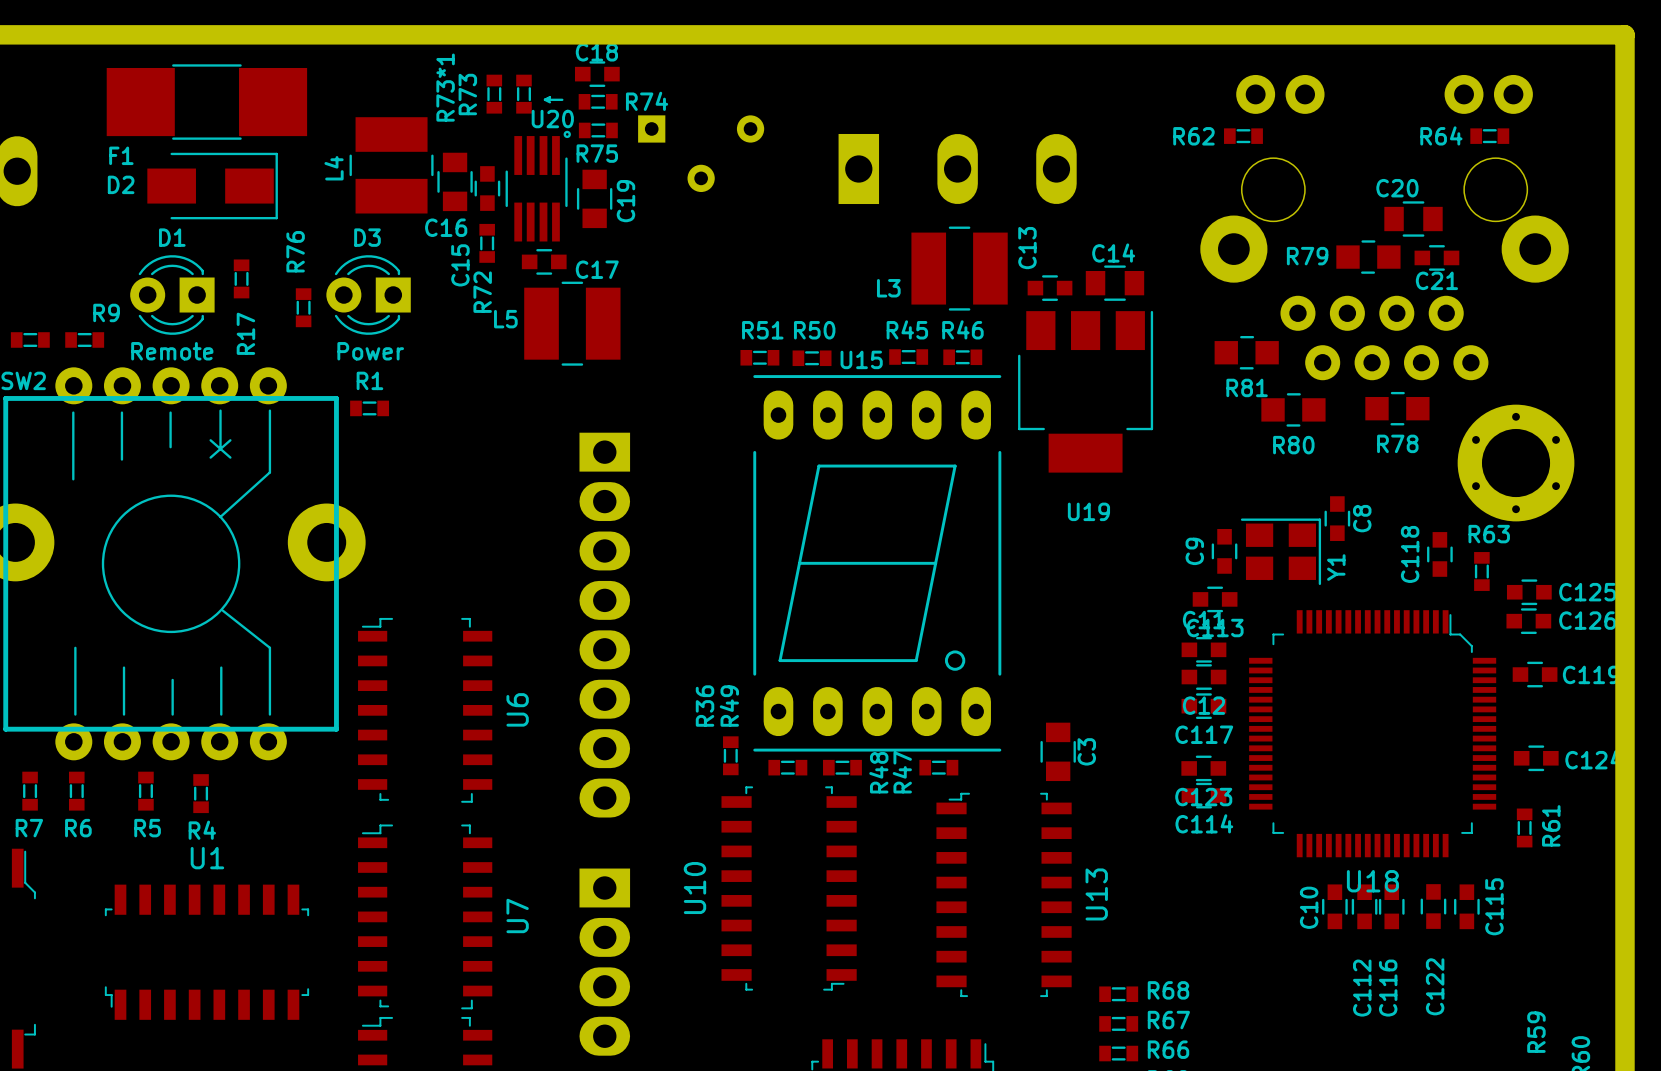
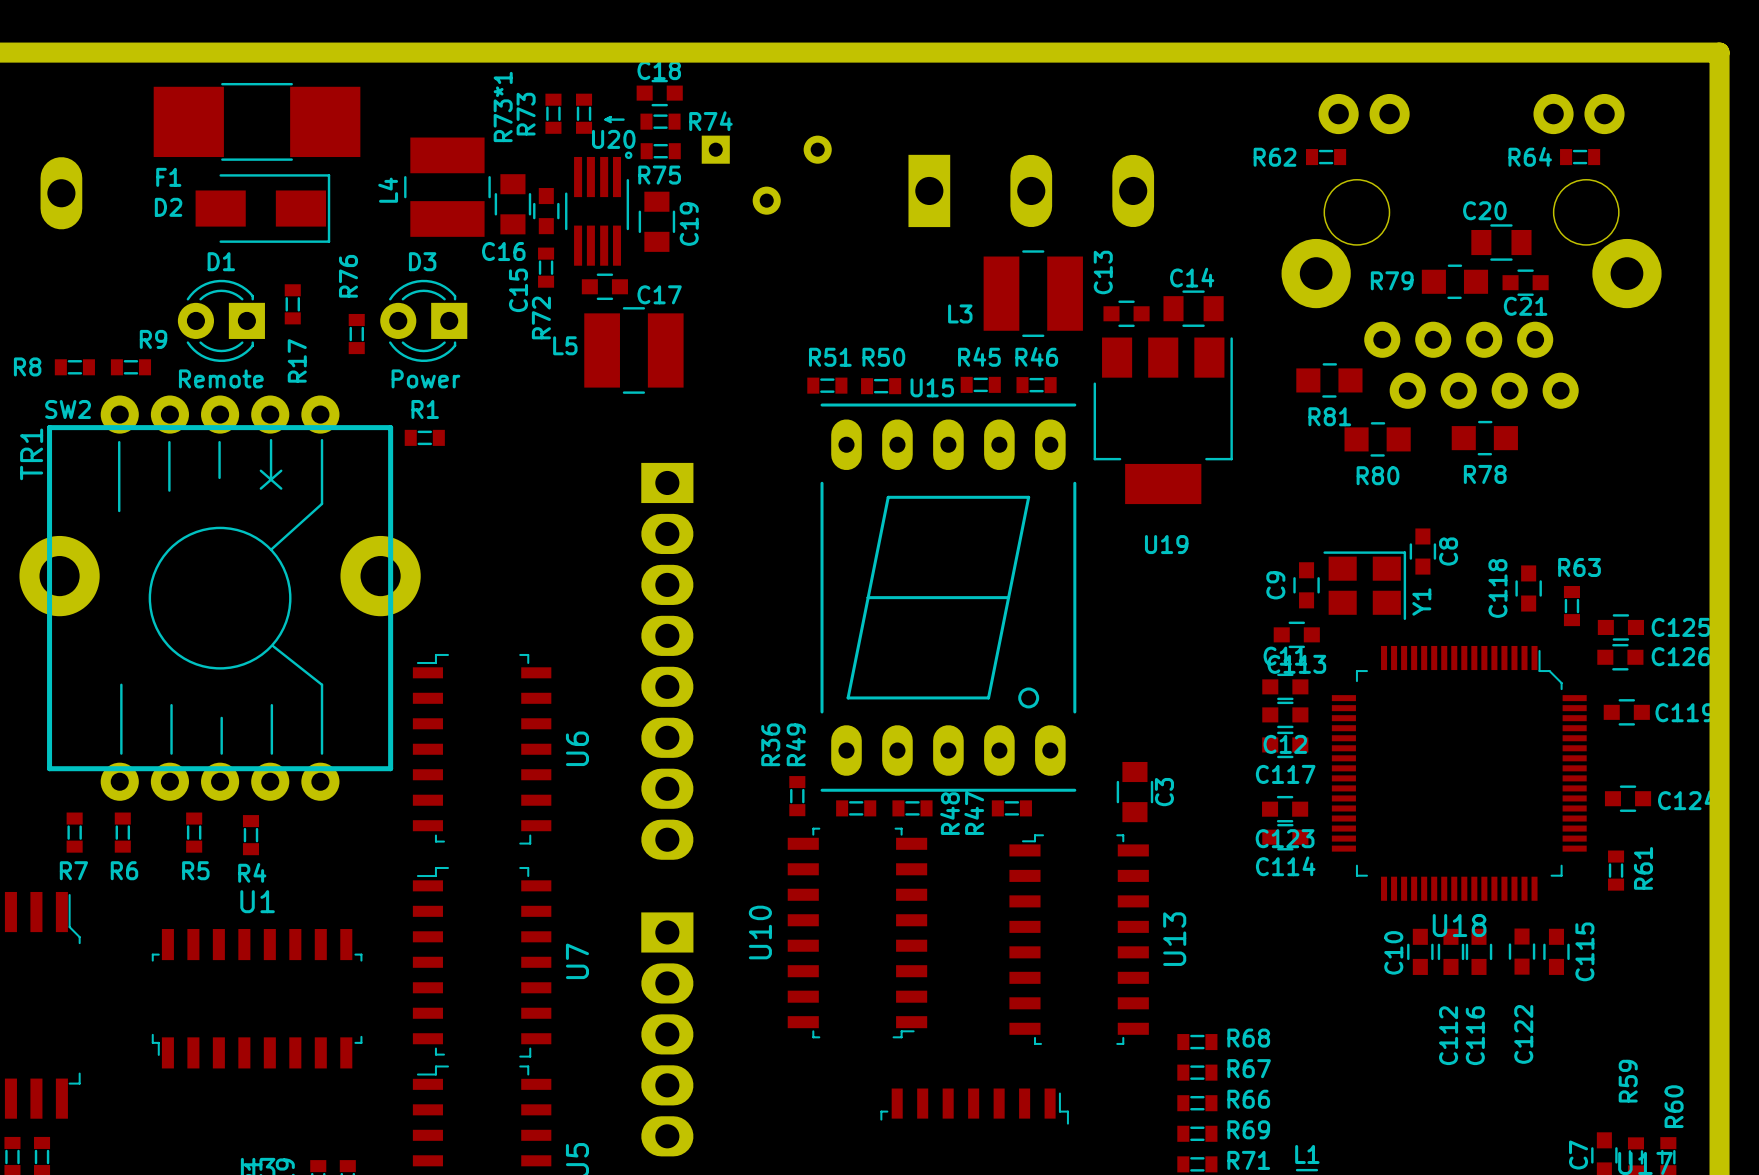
part: (1516, 463) -> none

